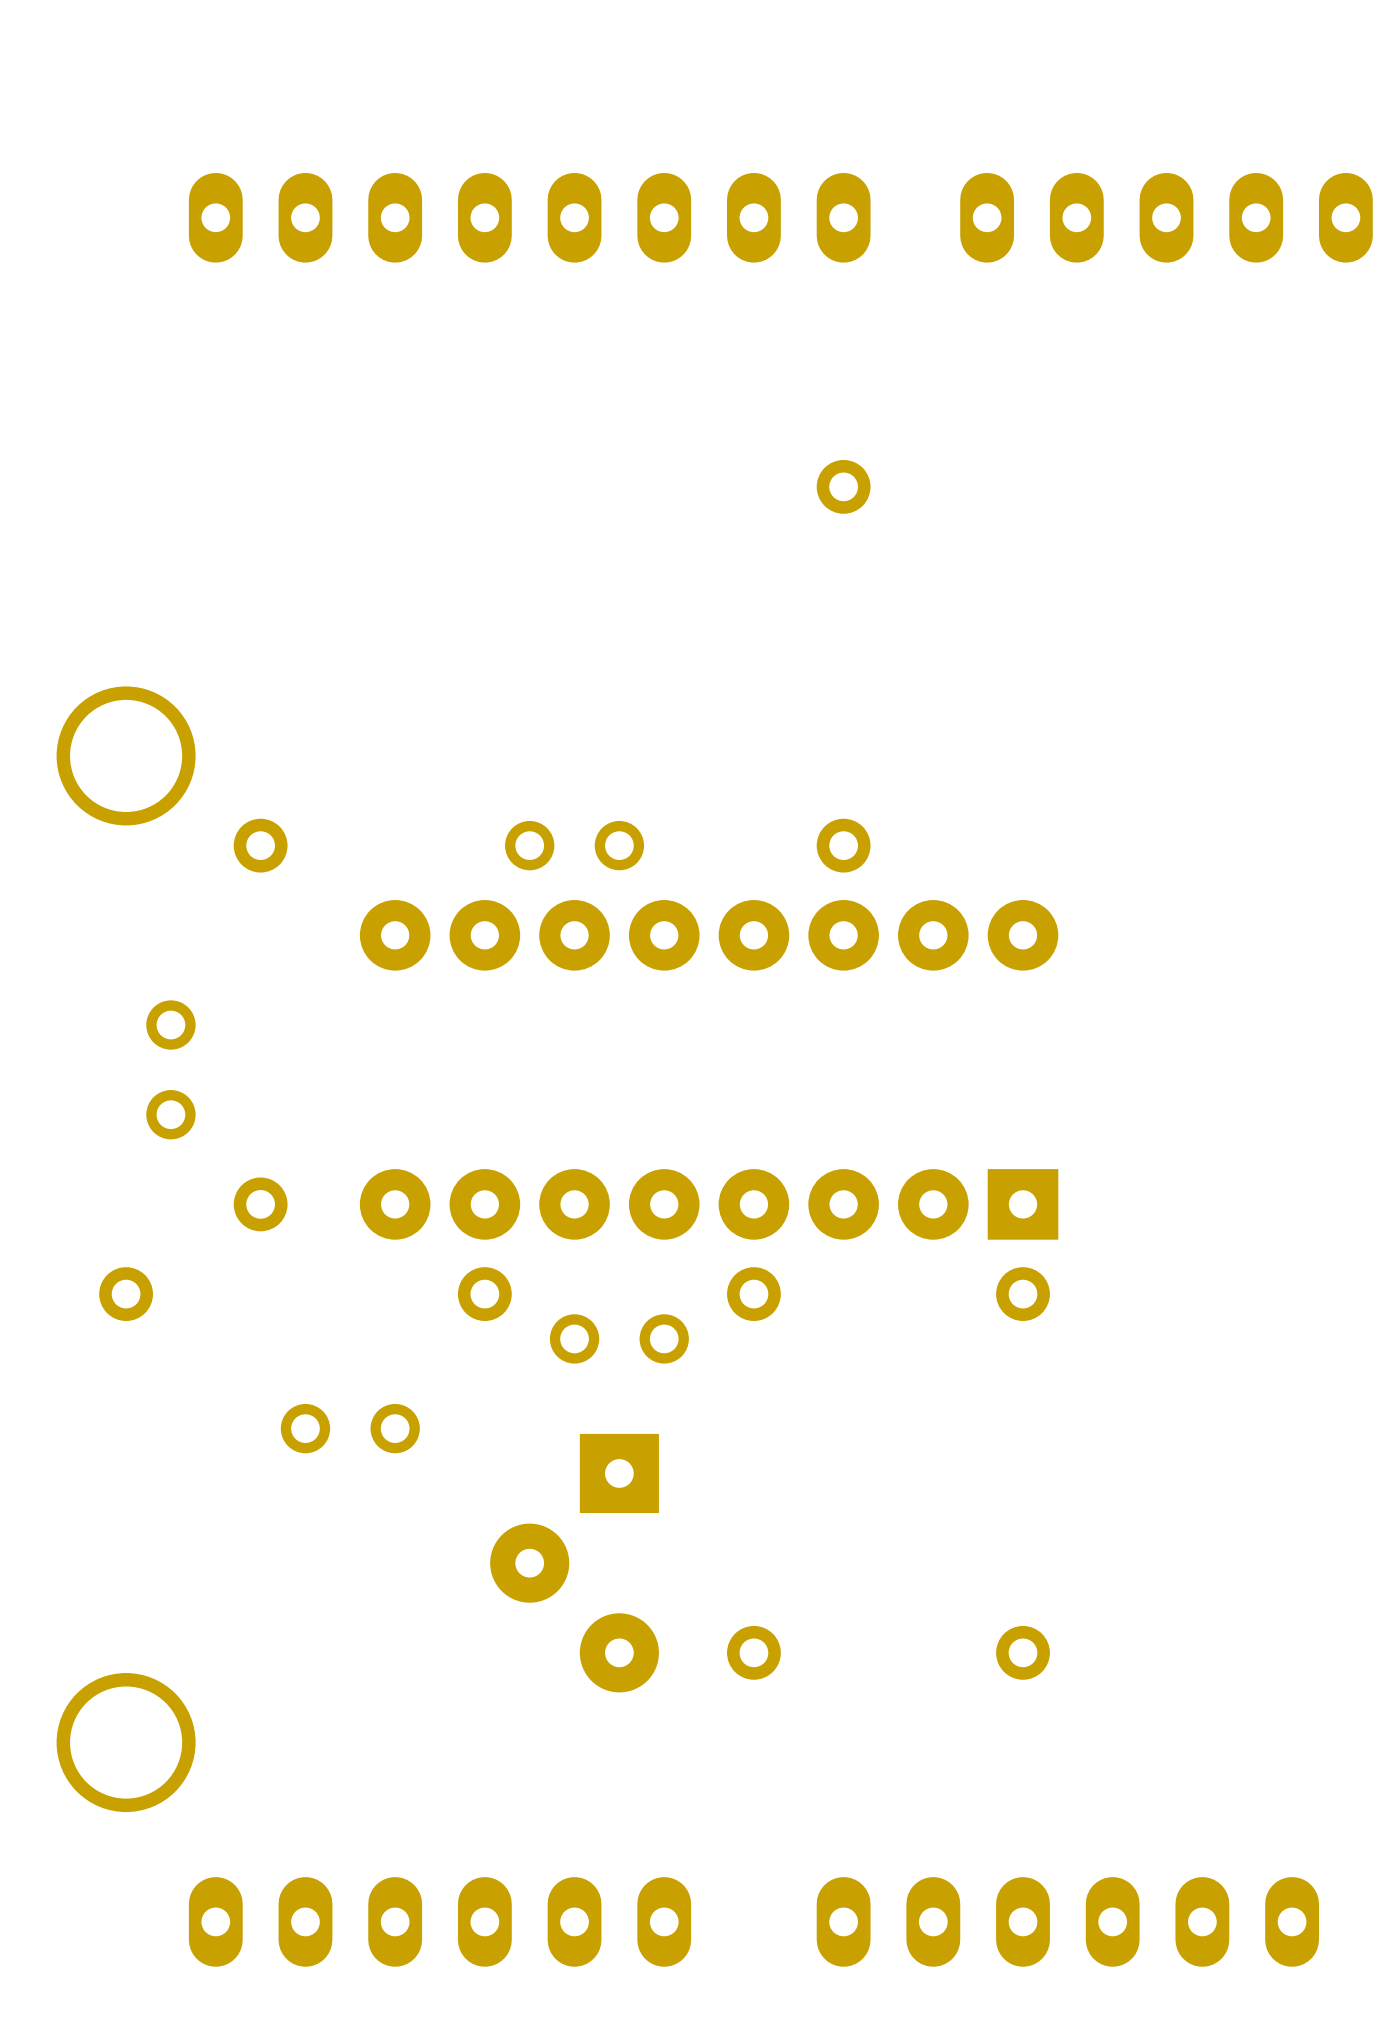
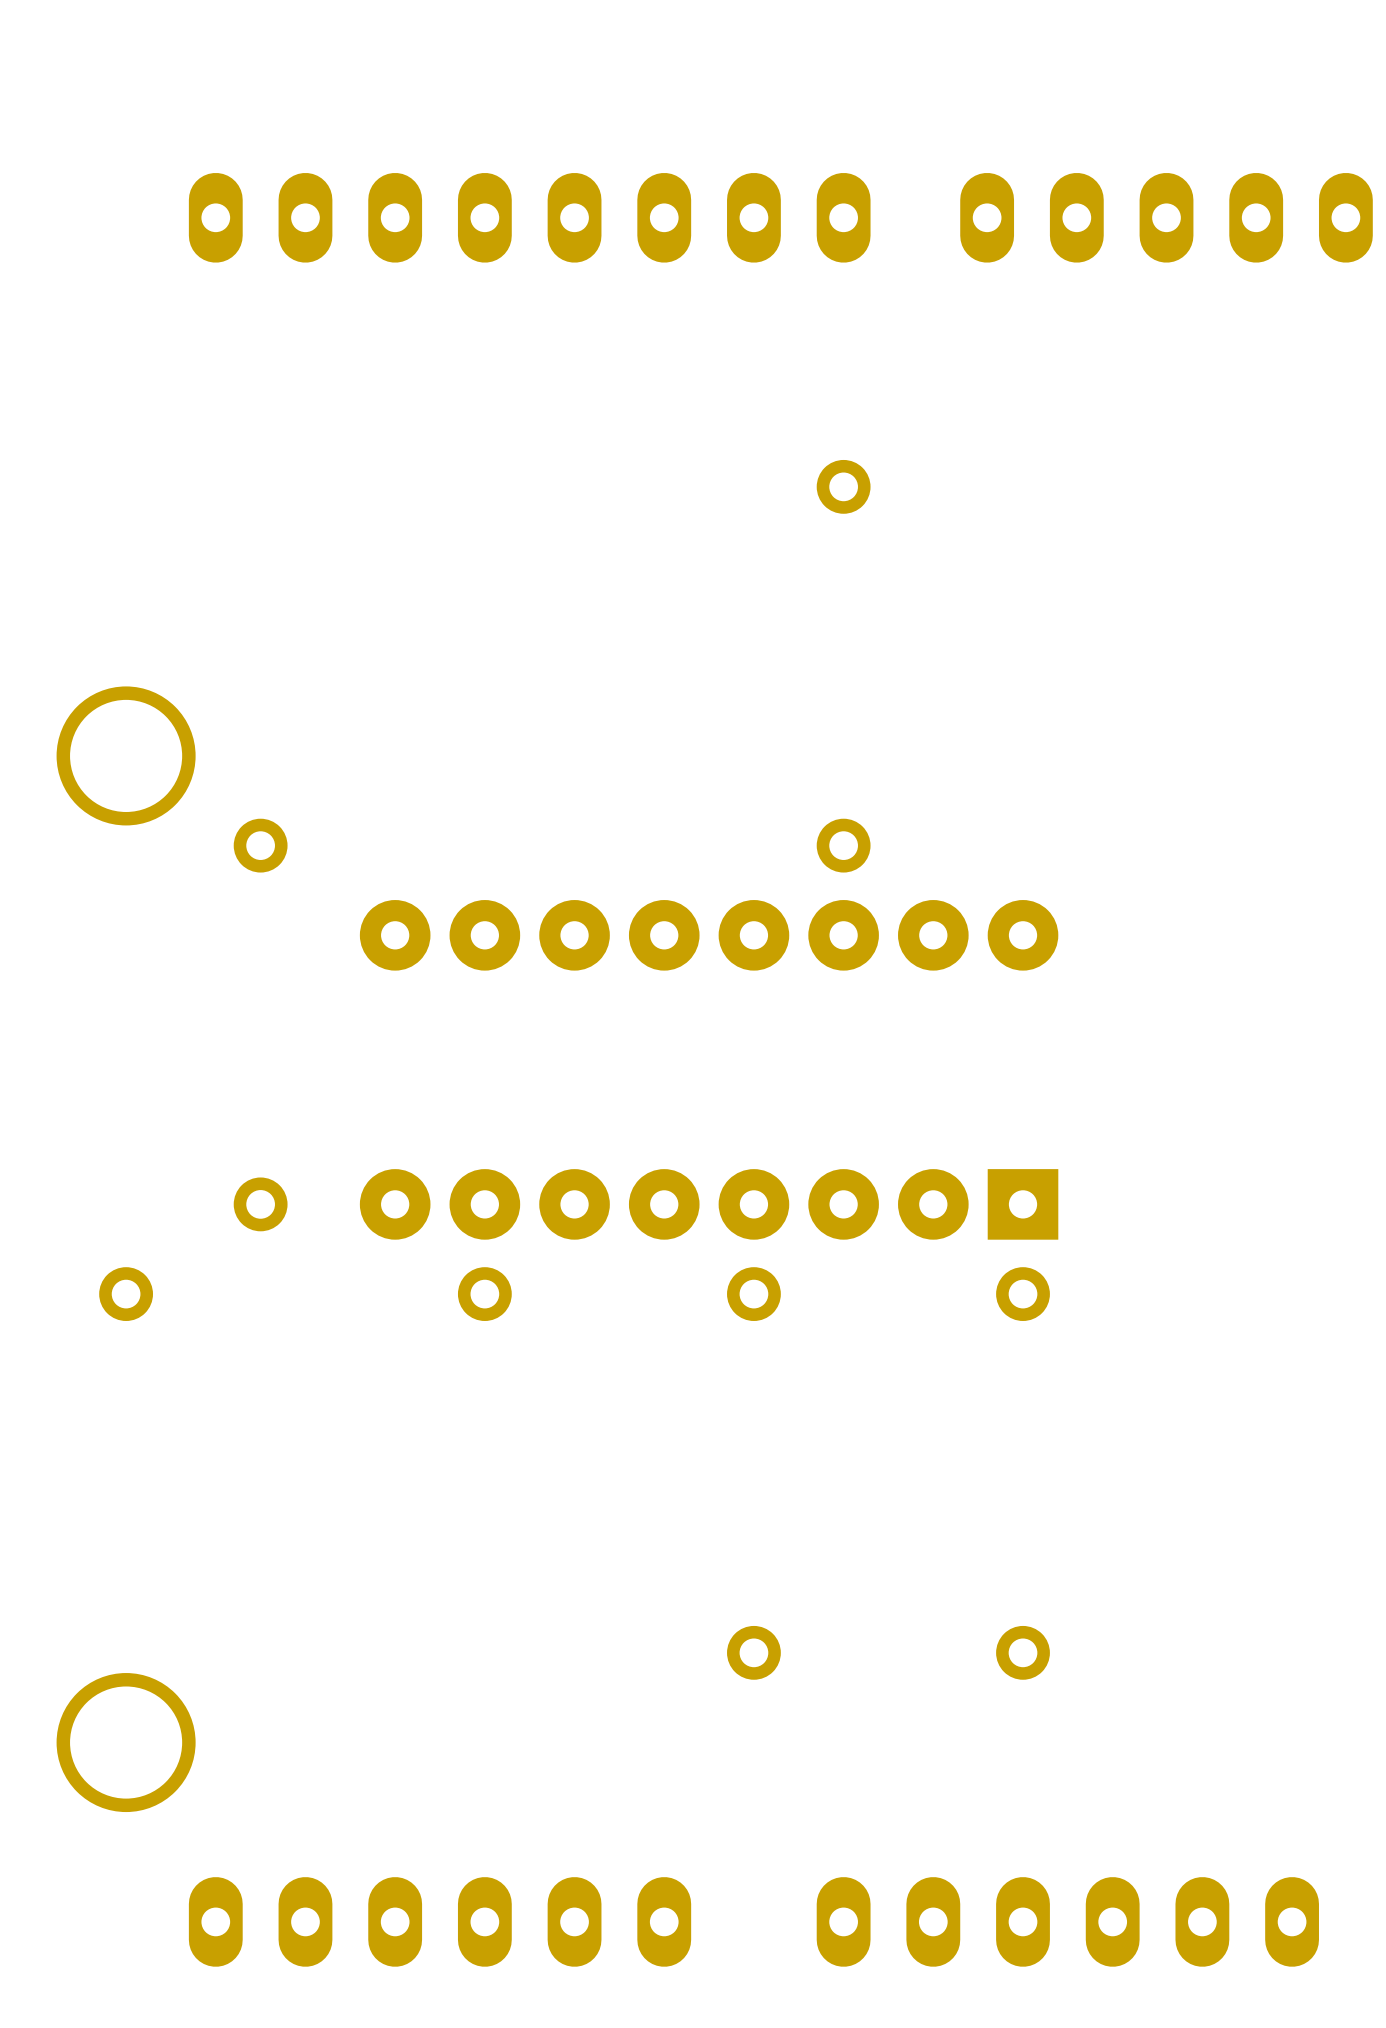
part: (574, 845) -> none
part: (170, 1069) -> none
part: (619, 1338) -> none
part: (350, 1428) -> none
part: (574, 1563) -> none

